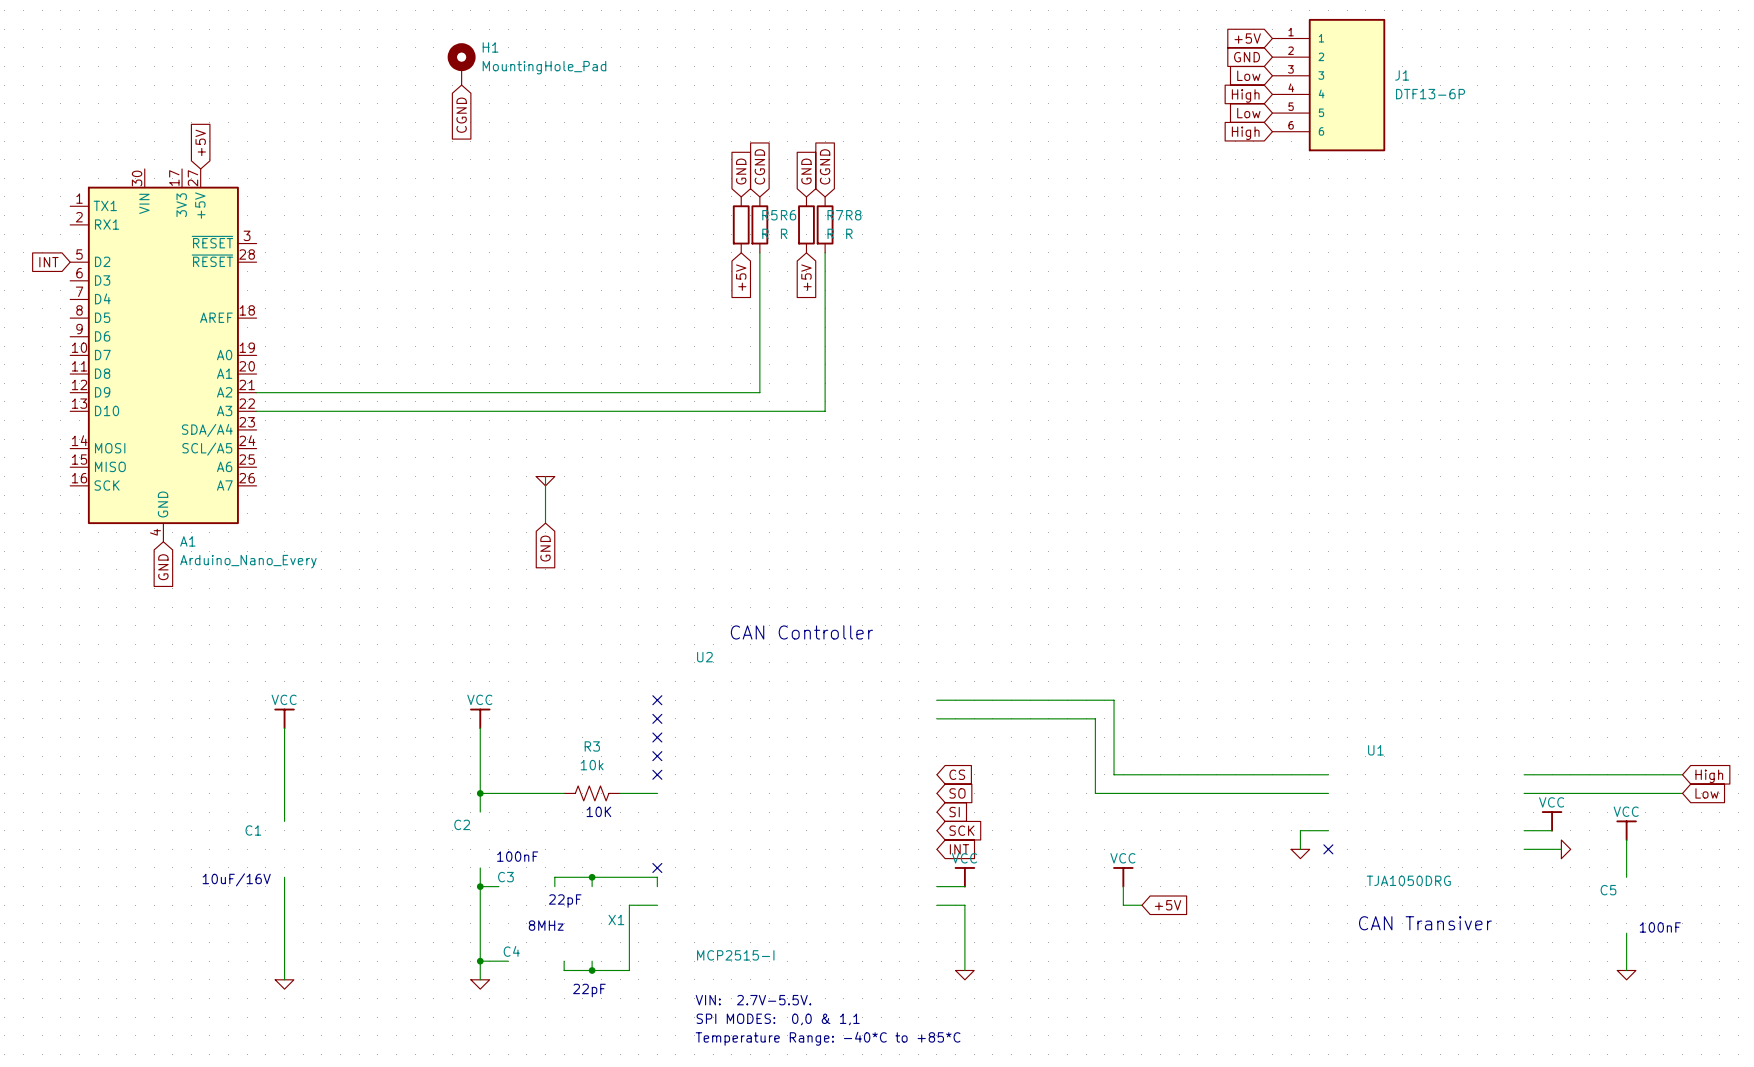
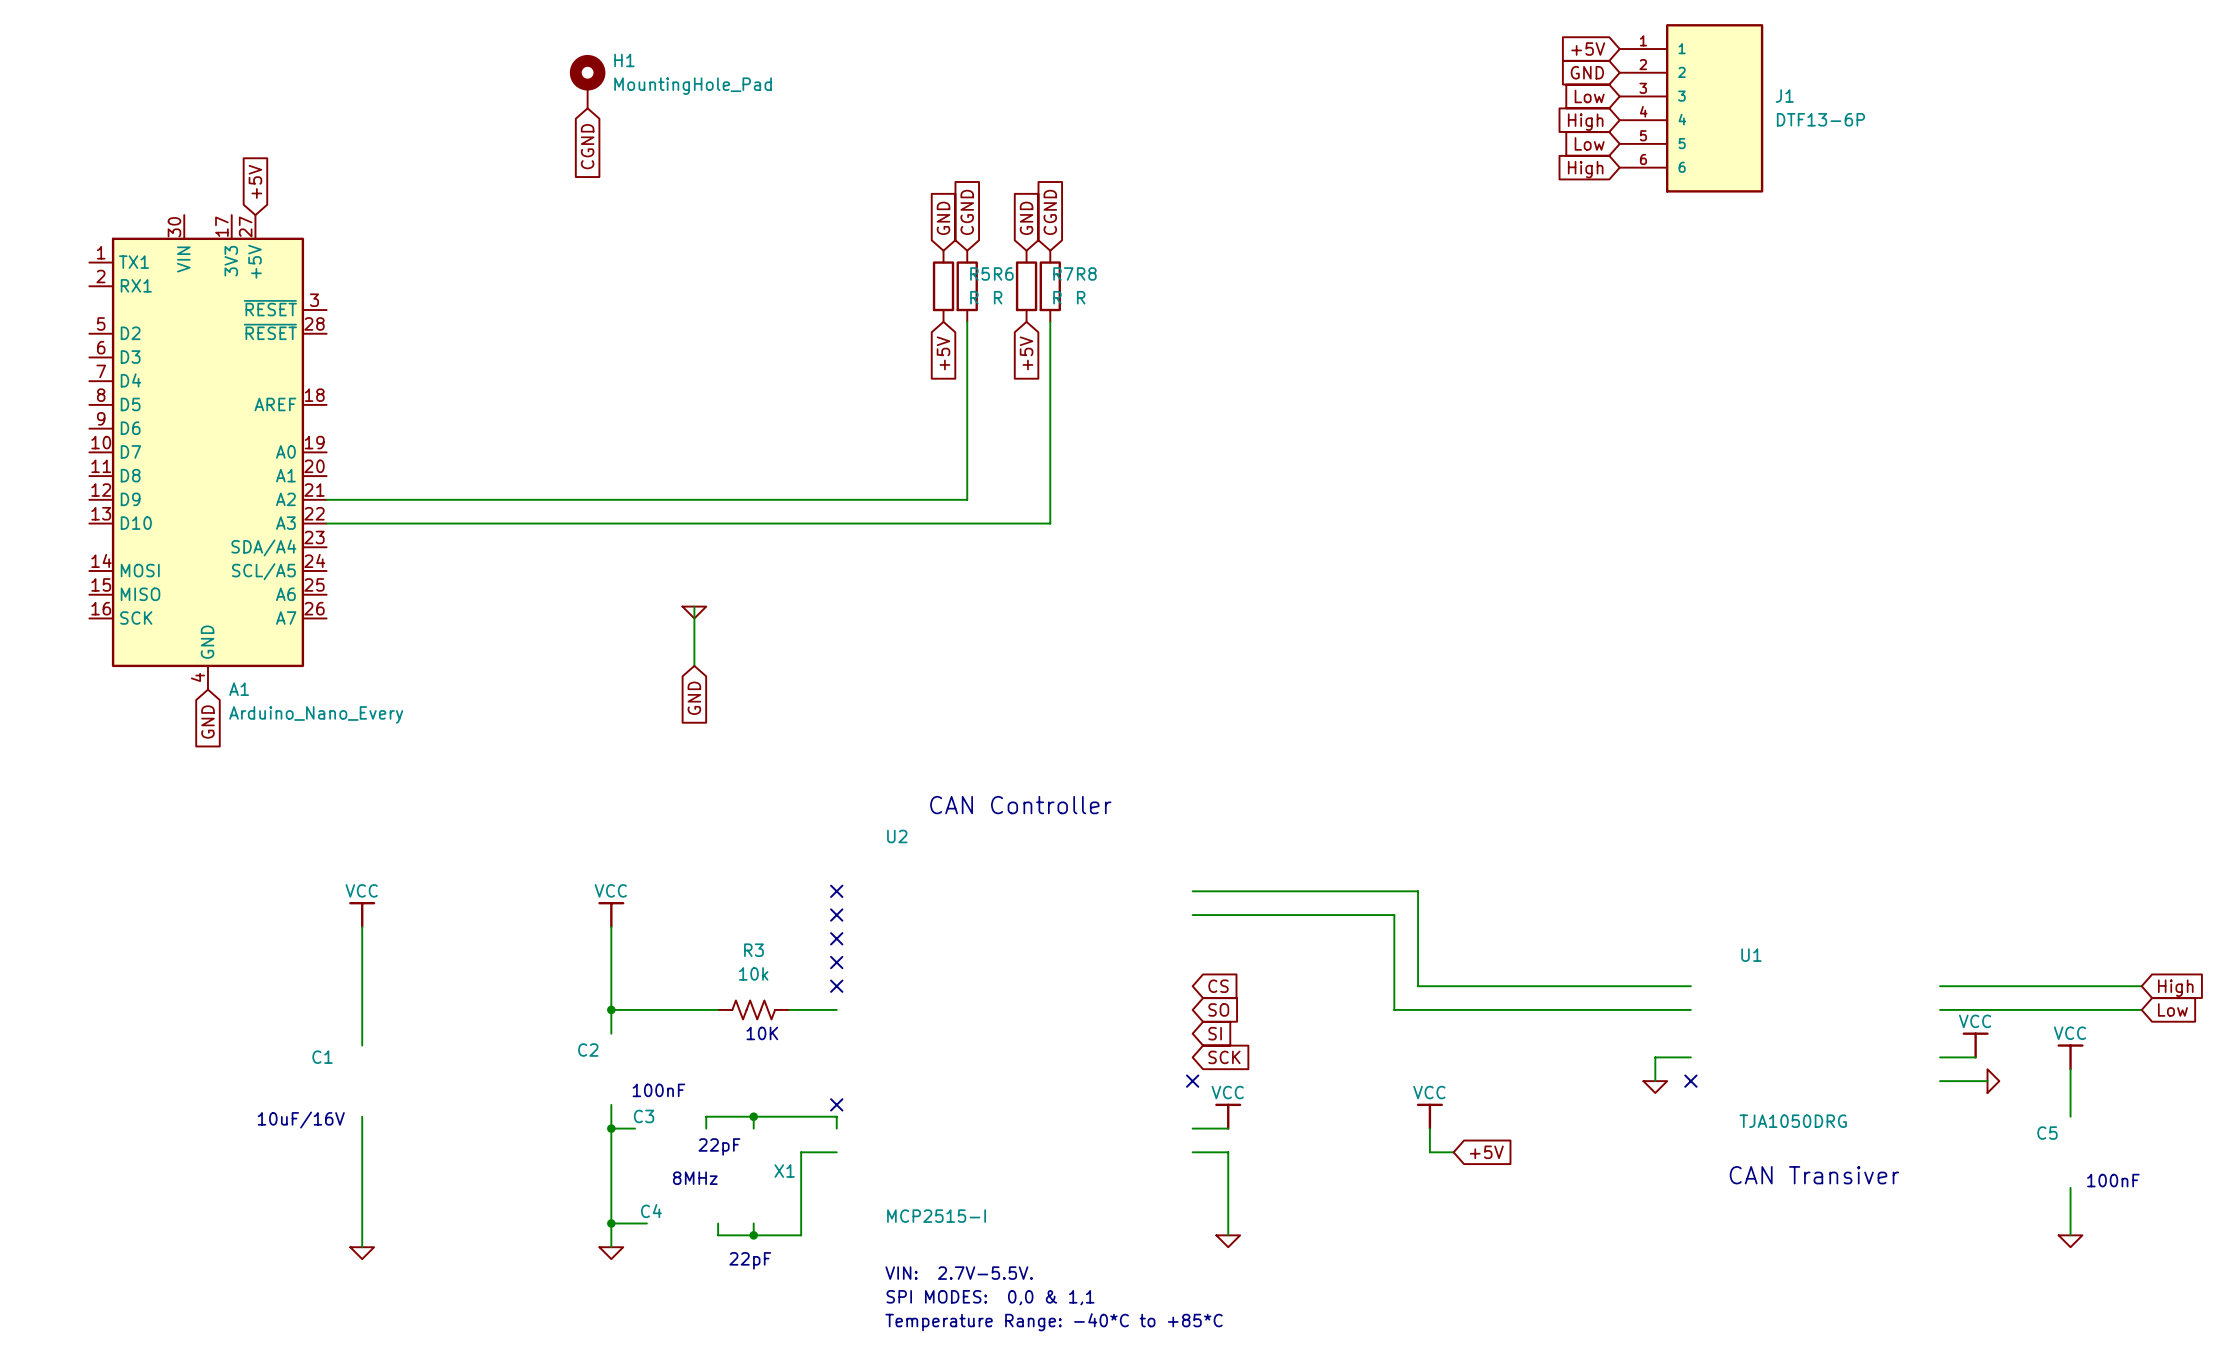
global label: INT (48, 262) -> none
no-connect mark: none -> (1192, 1081)
global label: INT (959, 849) -> none

